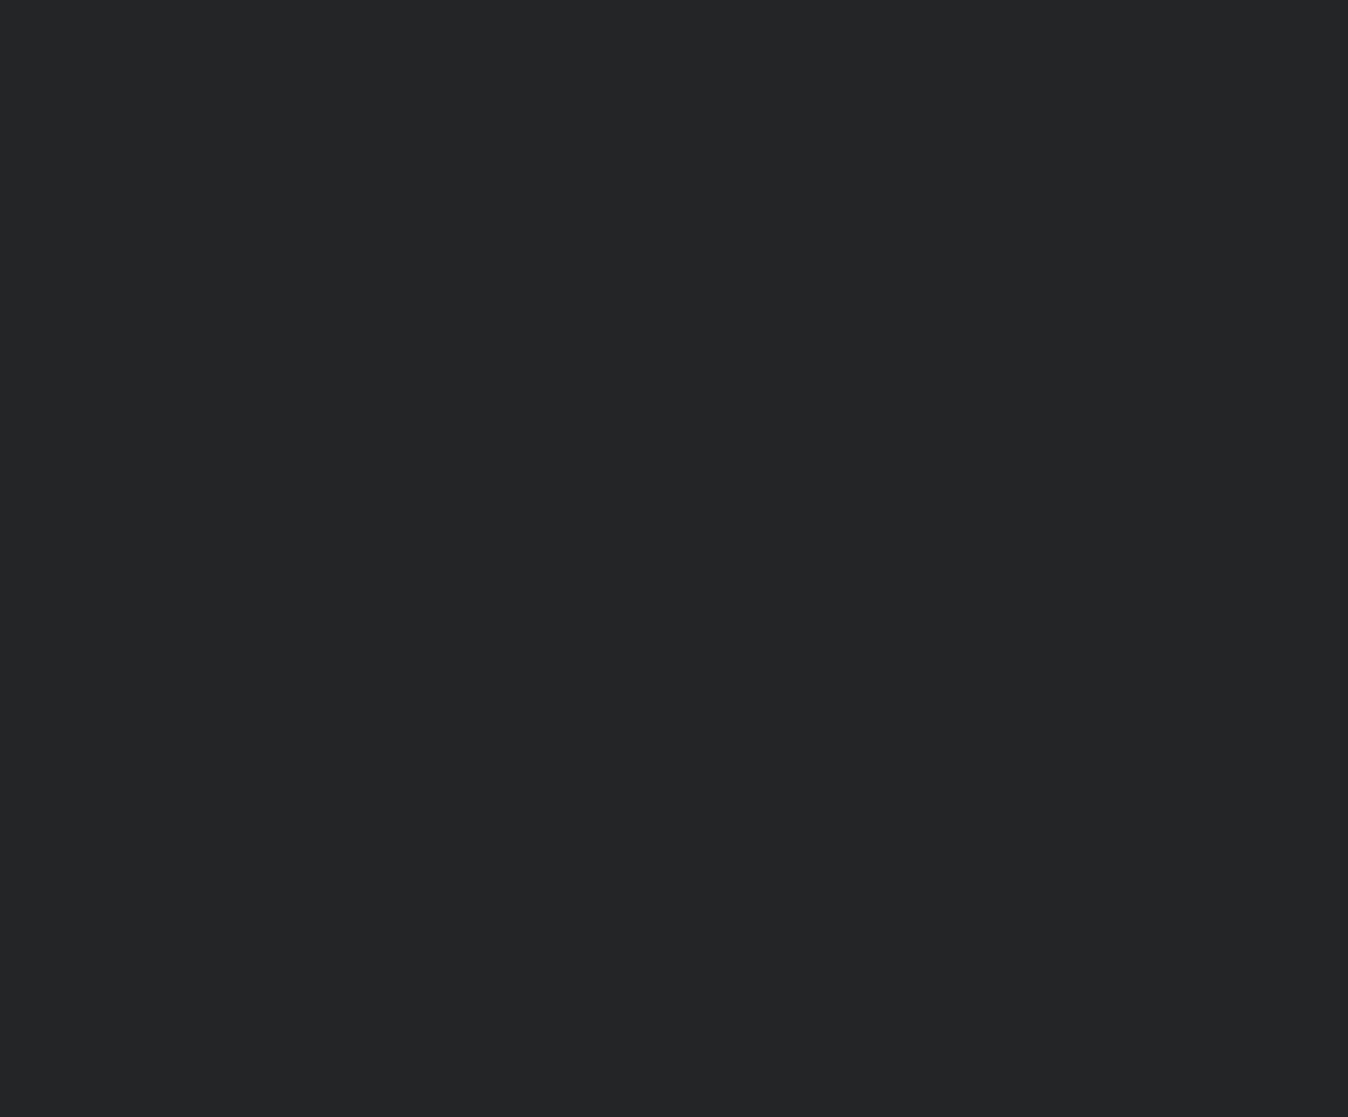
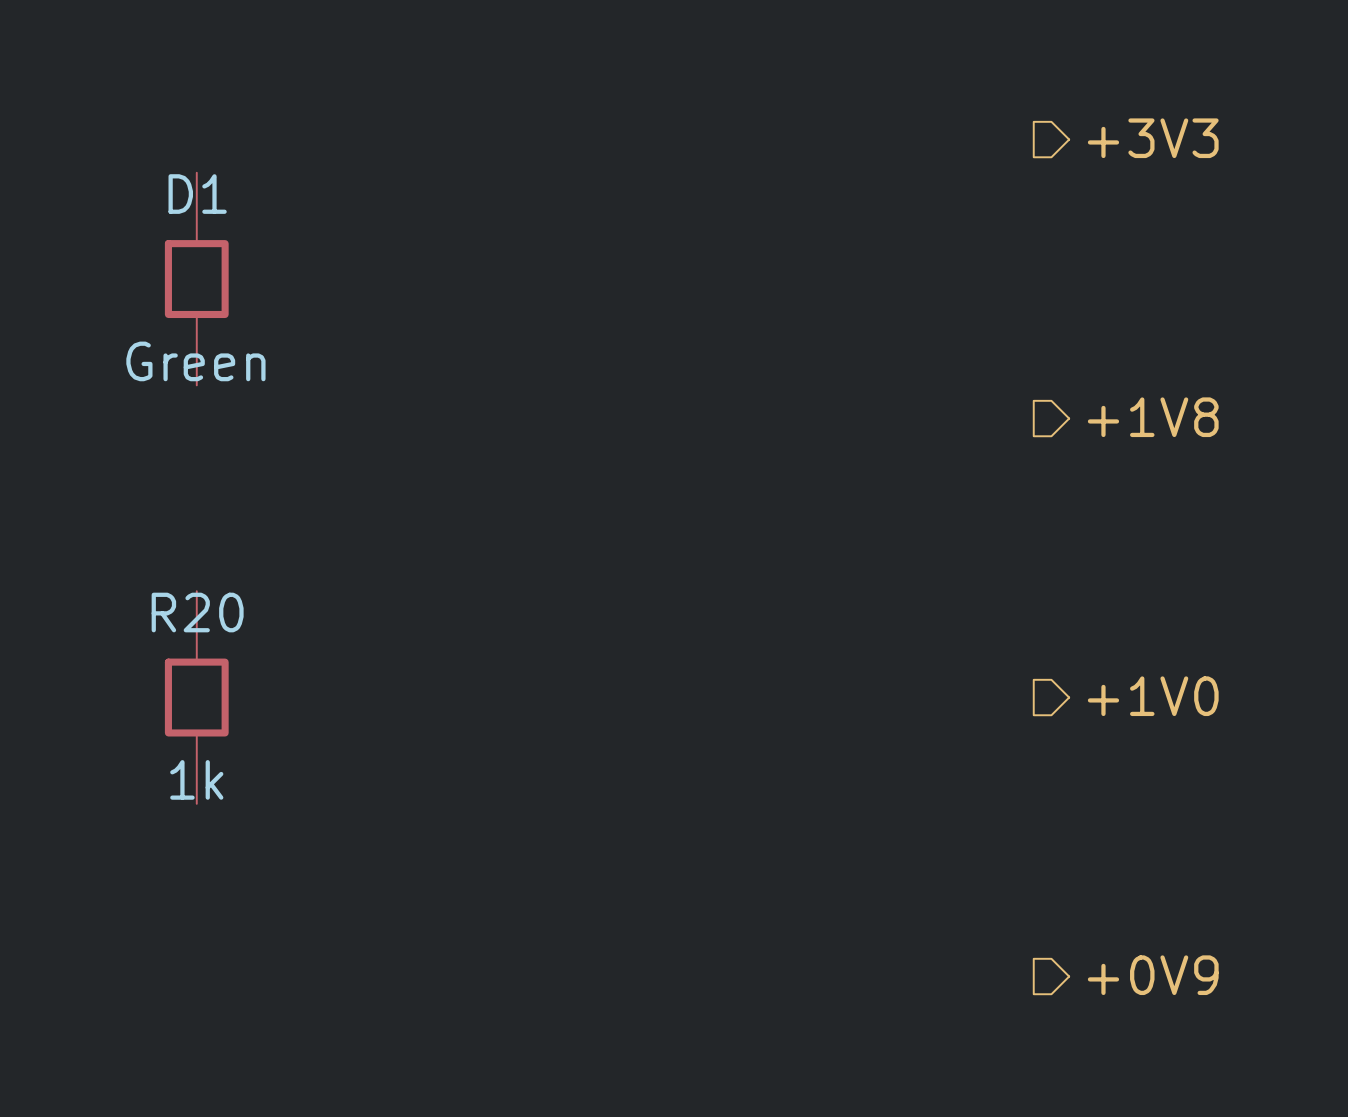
hierarchical label: none -> +3V3 (1153, 138)
D1: none -> Green (196, 279)
hierarchical label: none -> +1V8 (1153, 417)
hierarchical label: none -> +1V0 (1153, 696)
R20: none -> 1k (196, 697)
hierarchical label: none -> +0V9 (1153, 975)

